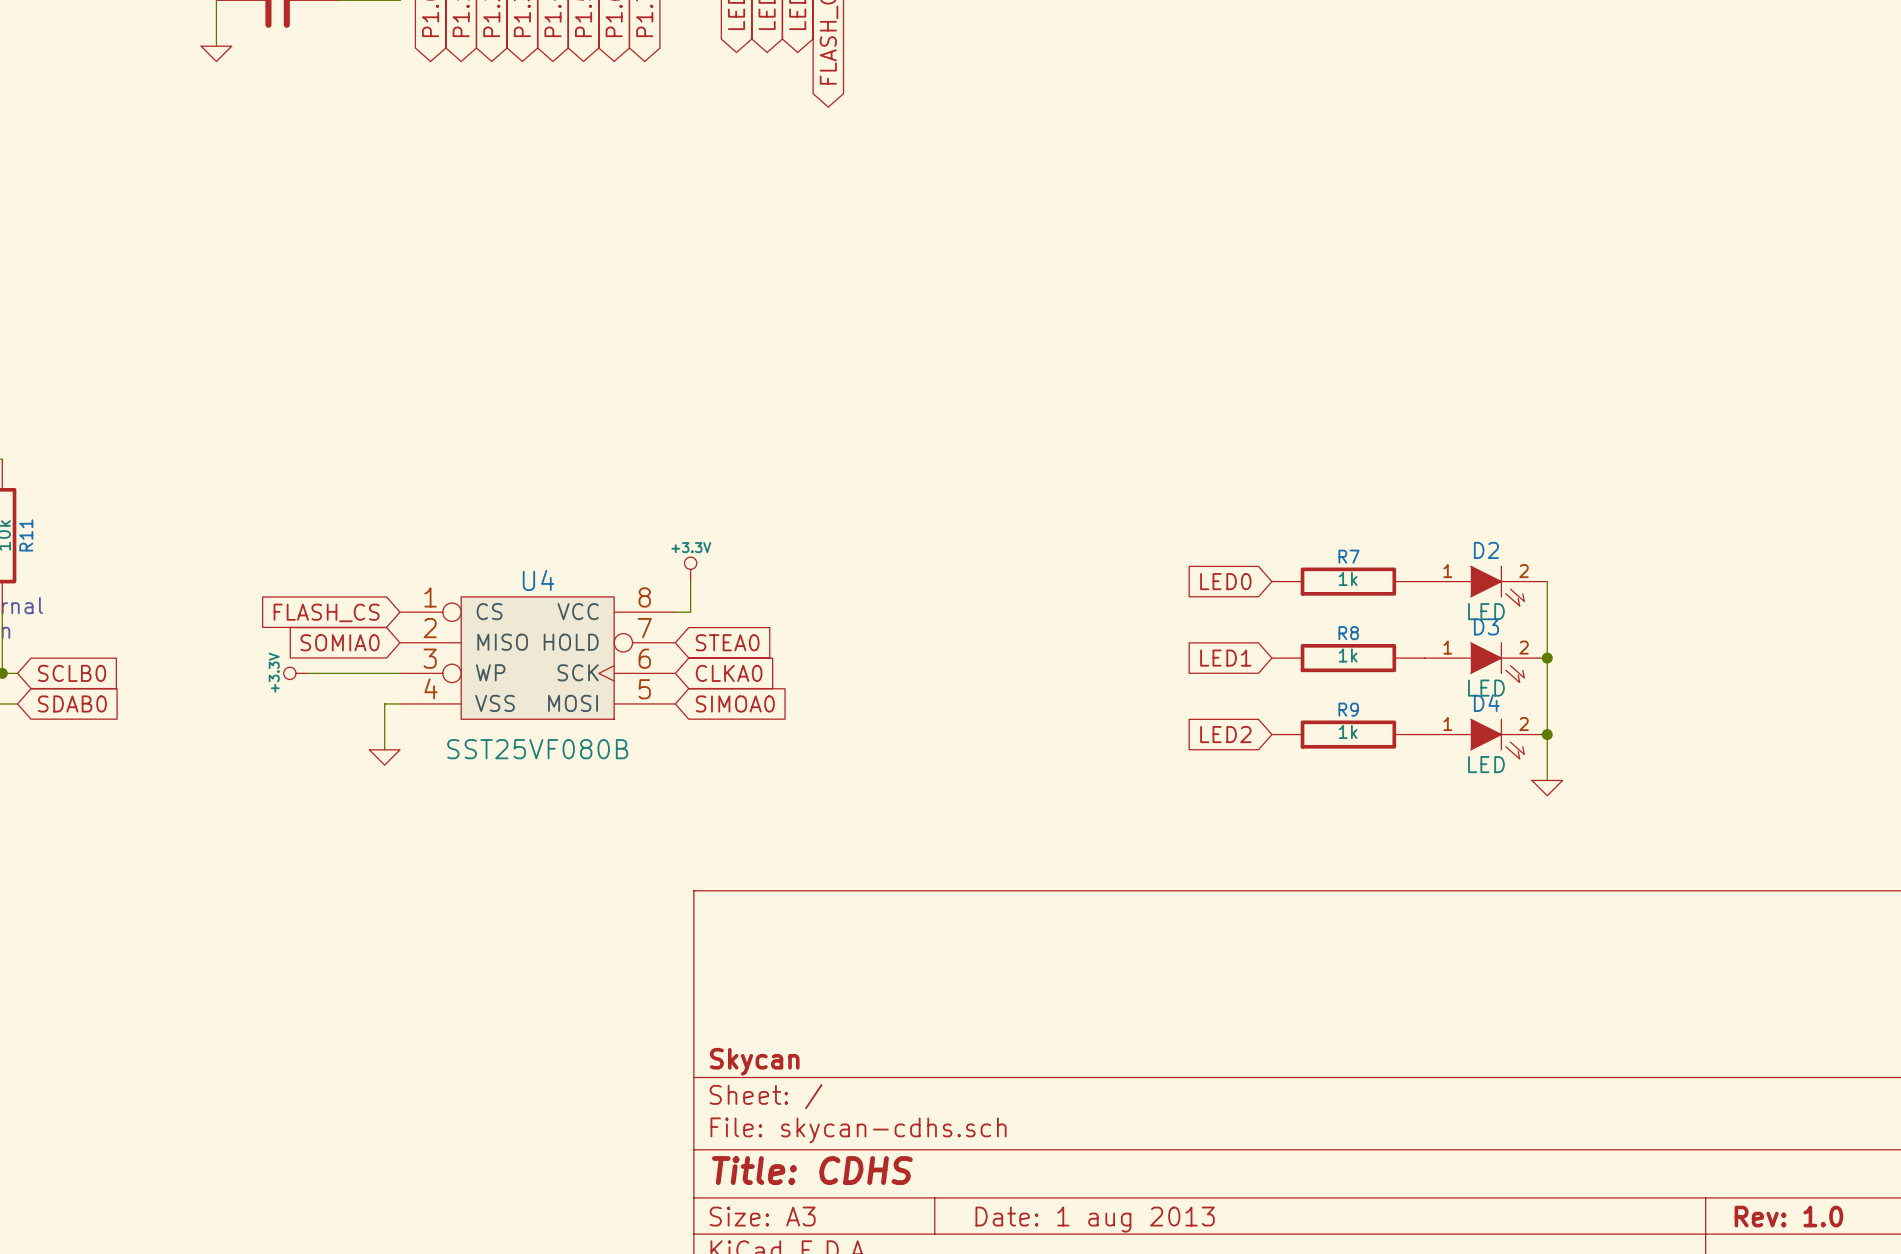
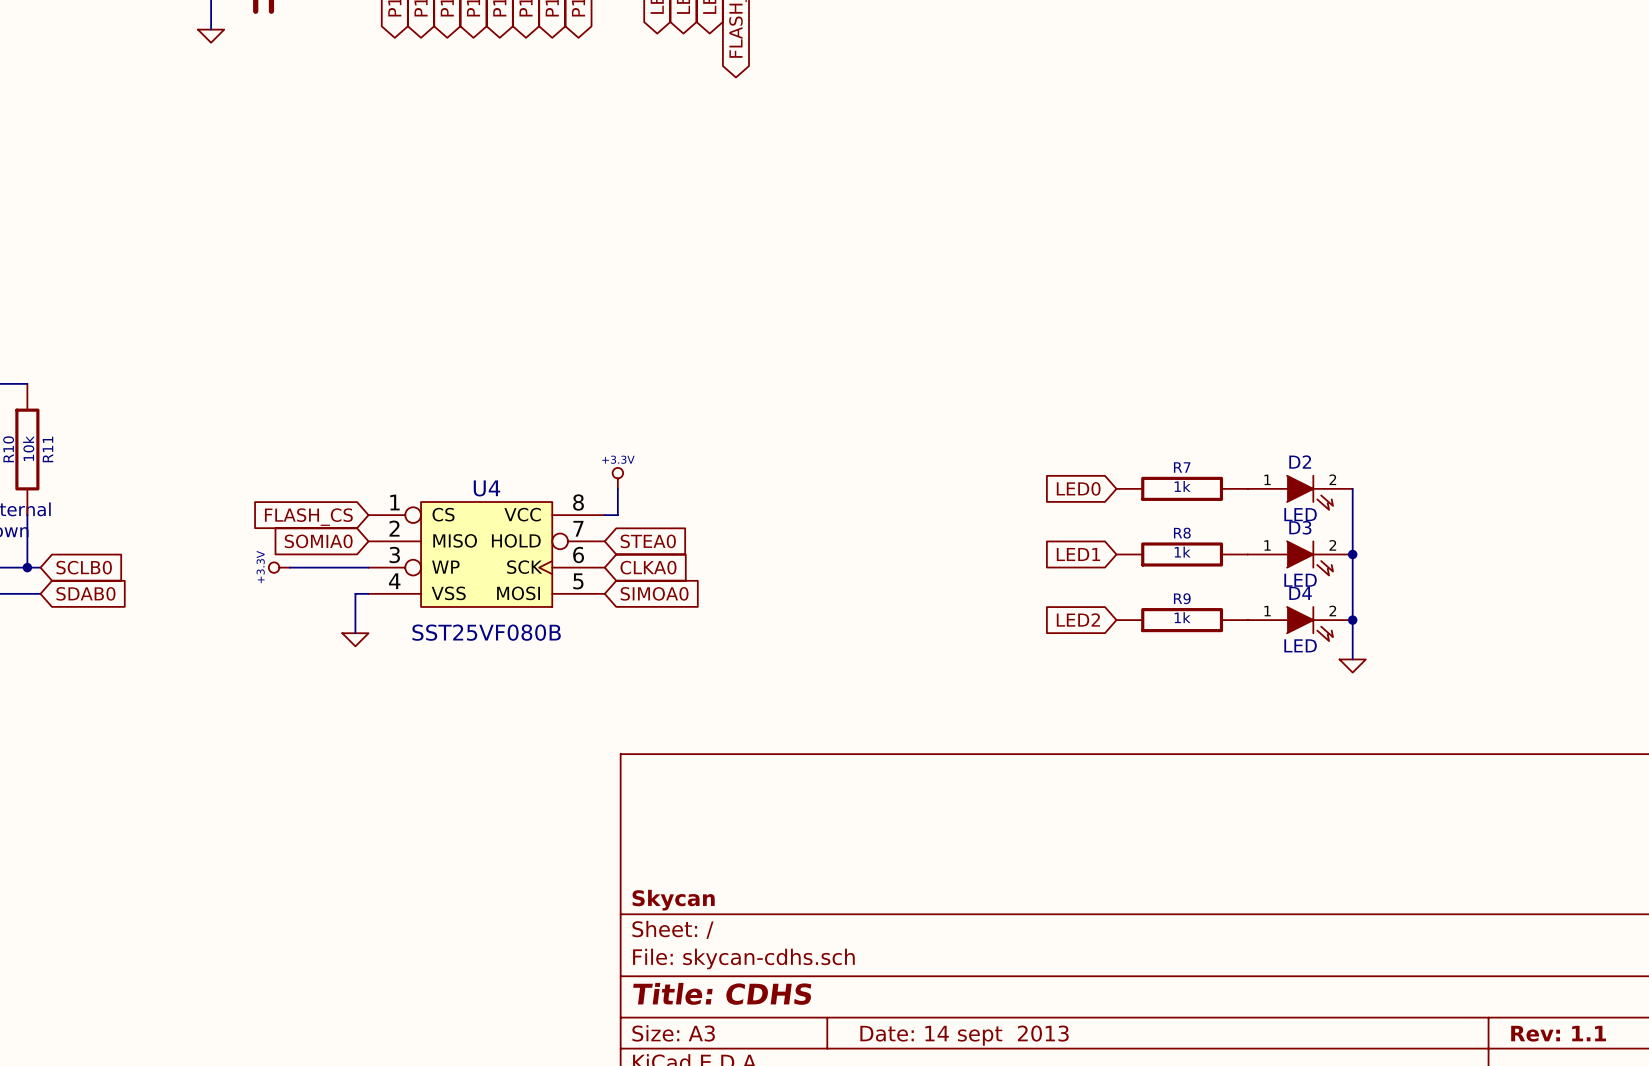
title block: Rev: 1.0 (1788, 1216) -> Rev: 1.1 (1558, 1033)
title block: Date: 1 aug 2013 (1095, 1219) -> Date: 14 sept 2013 (964, 1035)

